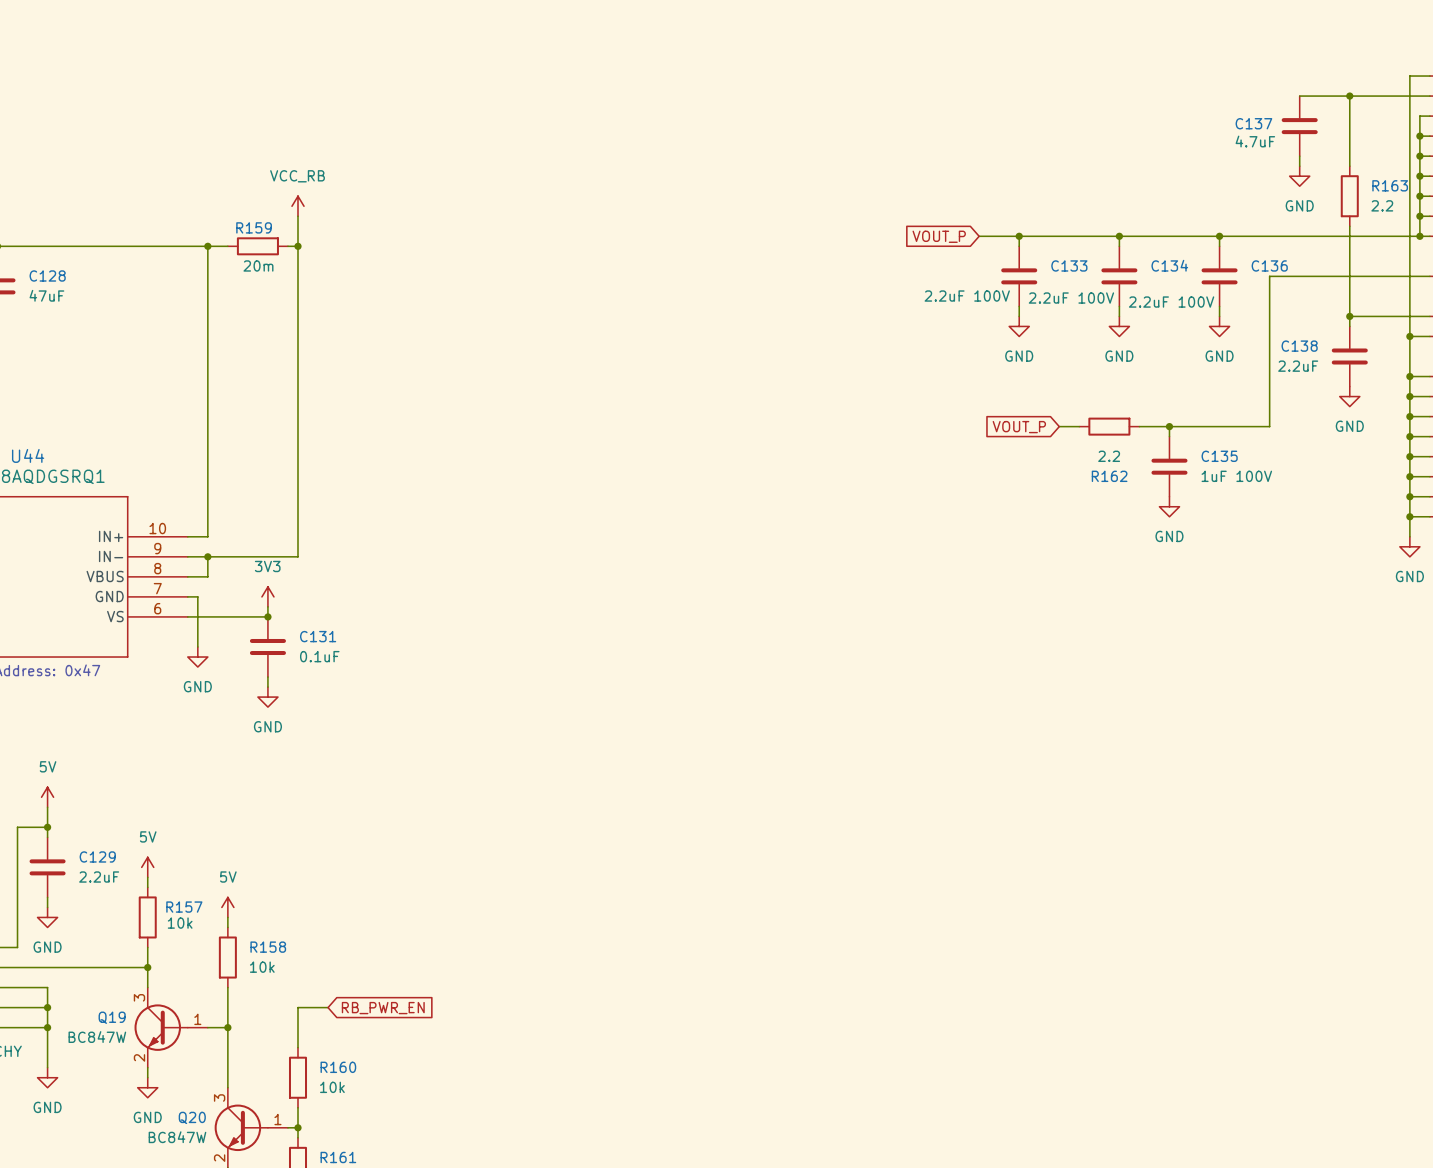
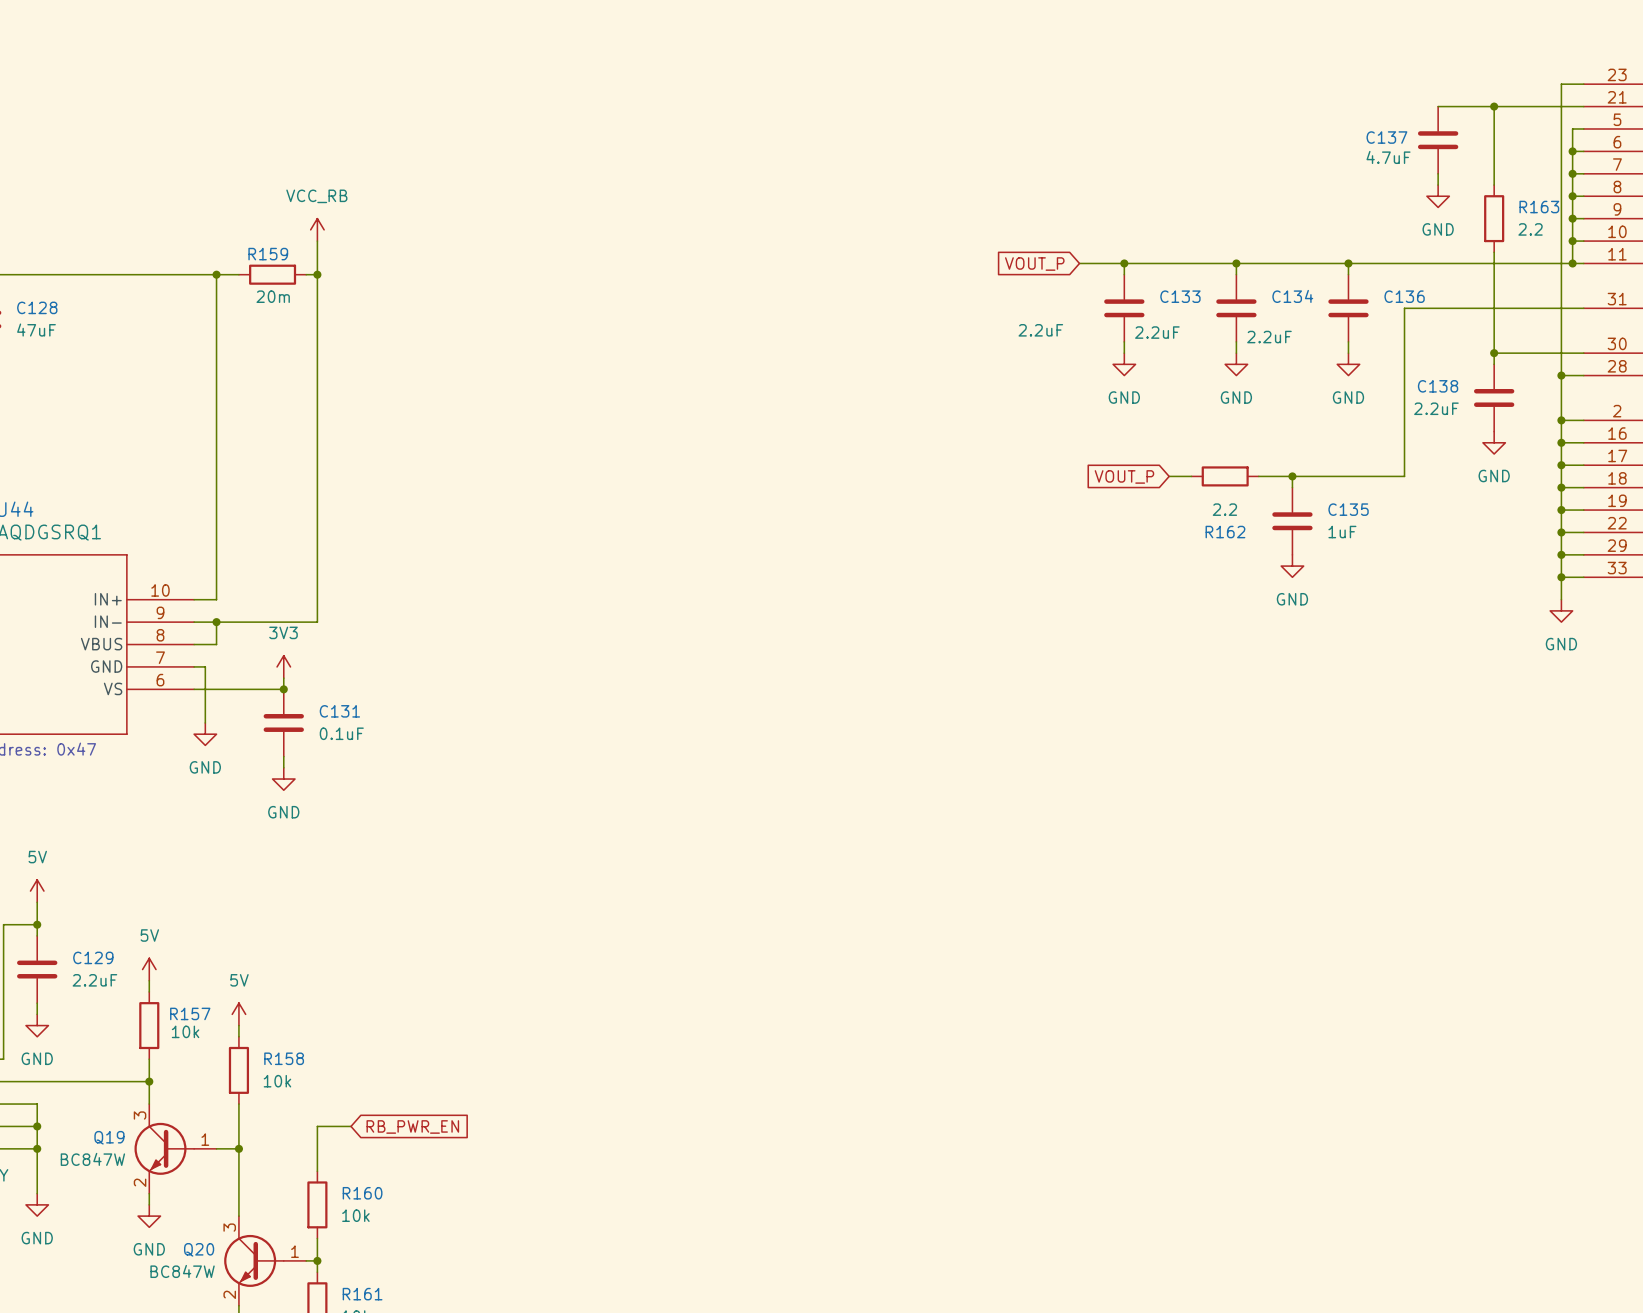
C133 value: 2.2uF 100V (967, 296) -> 2.2uF (1040, 330)
C134 value: 2.2uF 100V (1071, 298) -> 2.2uF (1157, 332)
C136 value: 2.2uF 100V (1171, 302) -> 2.2uF (1269, 337)
C135 value: 1uF 100V (1236, 476) -> 1uF (1342, 532)

